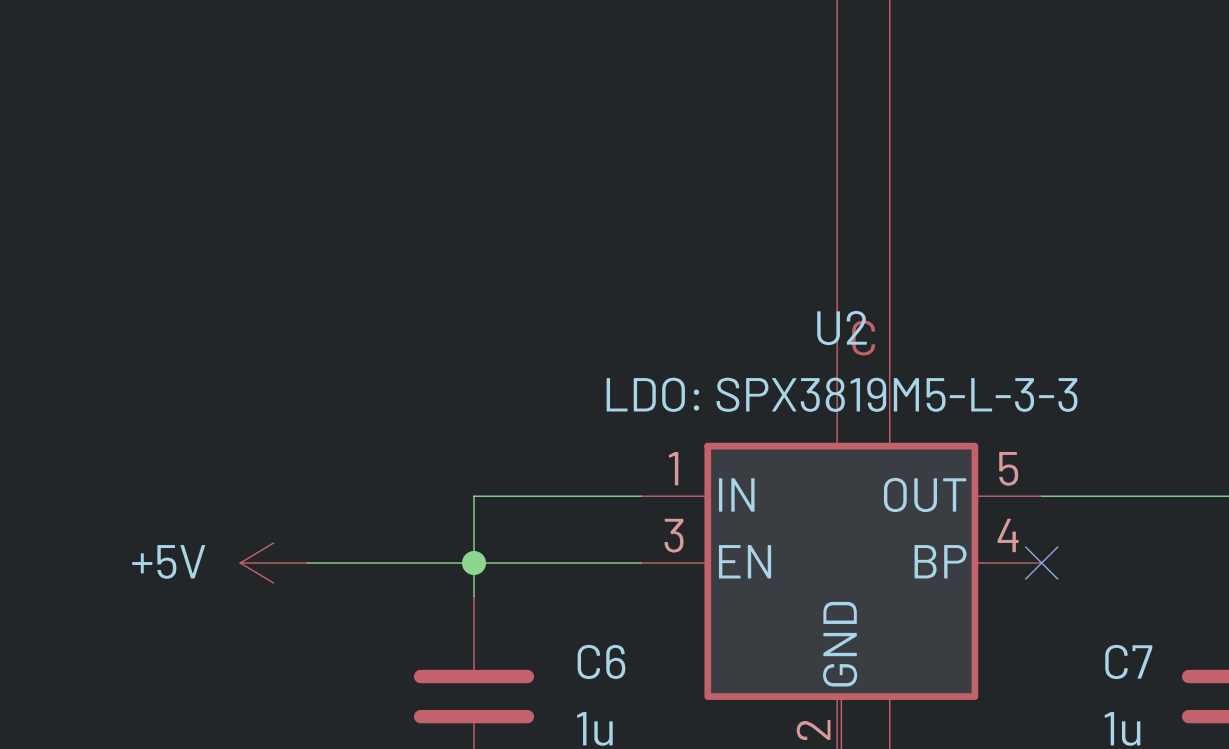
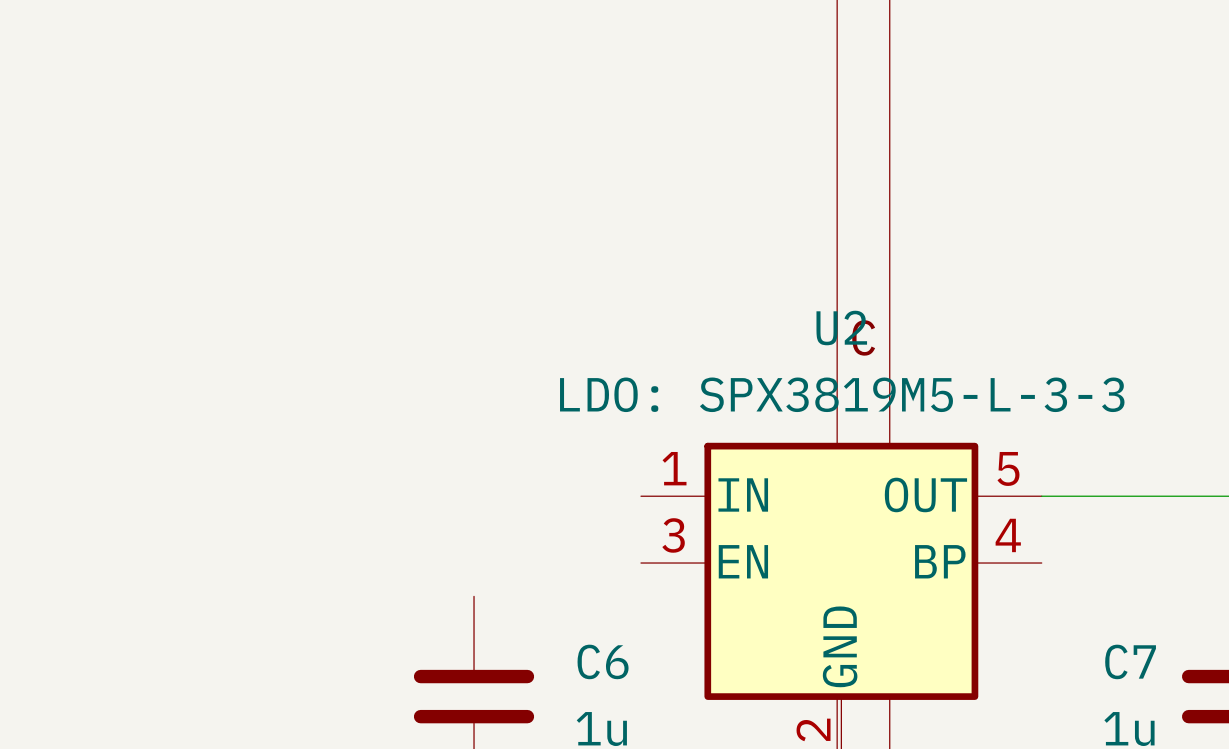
wire: (640, 496) (474, 496) (474, 596) -> none
power symbol: +5V (273, 563) -> none
wire: (307, 563) (640, 563) -> none
junction: (474, 563) -> none
no-connect mark: (1041, 563) -> none

